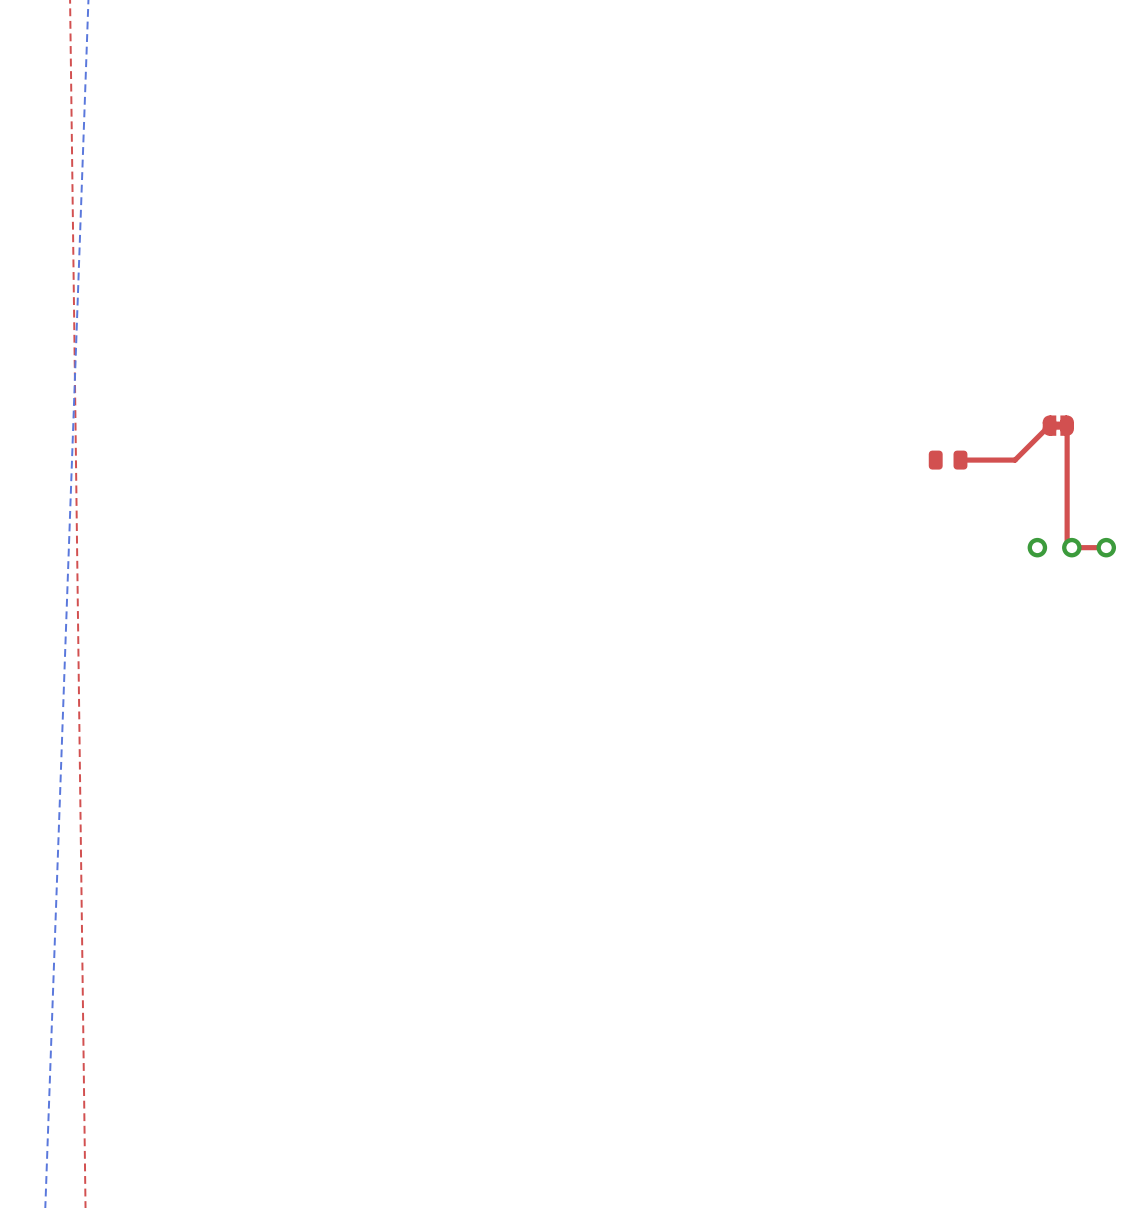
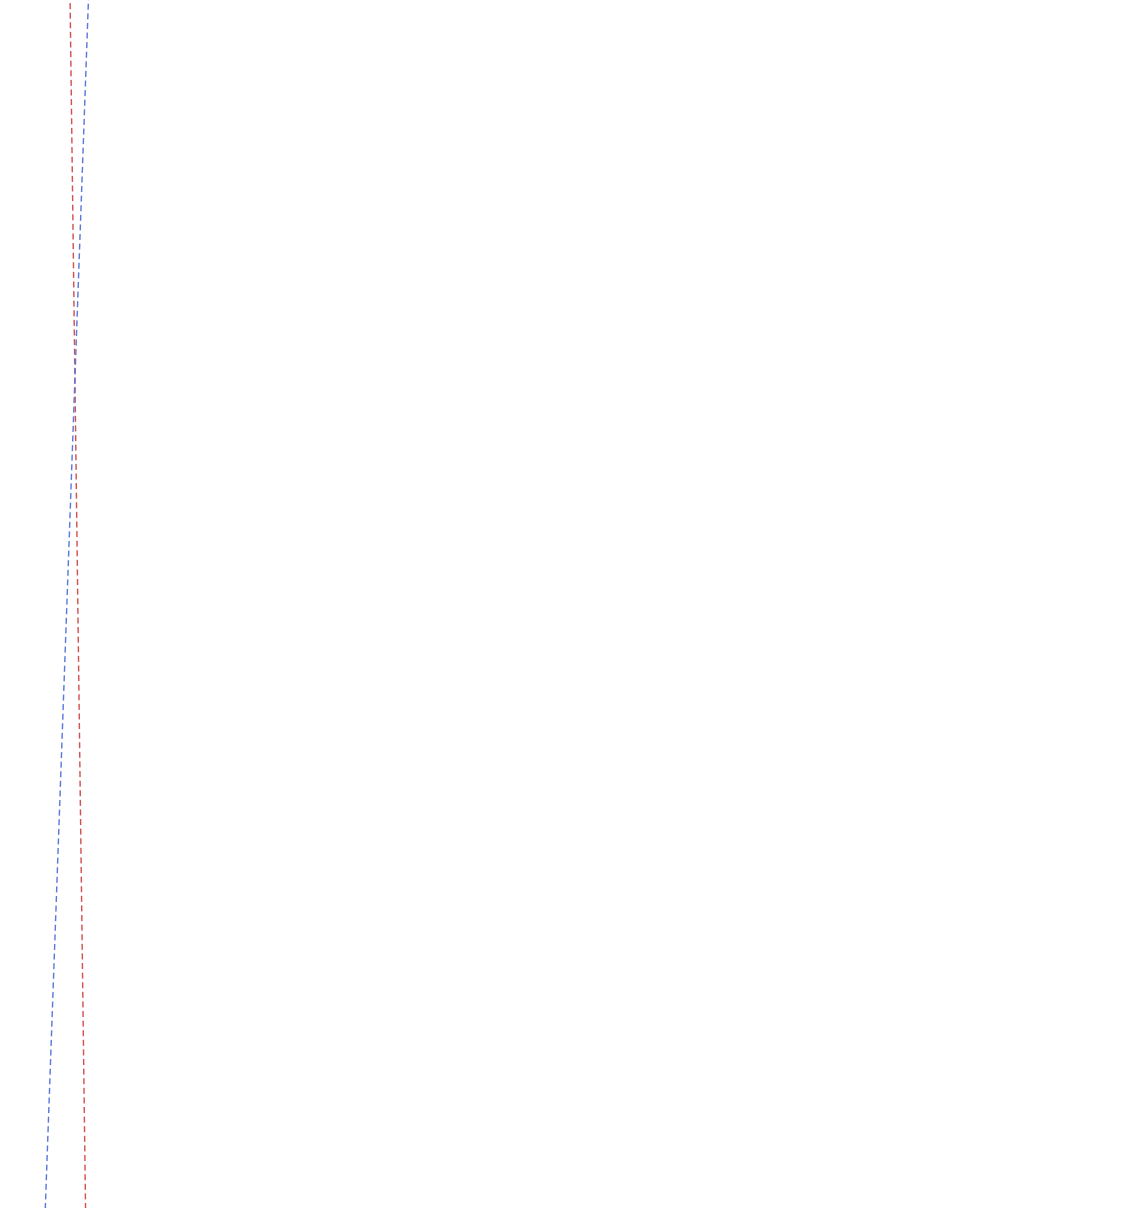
top track: (1049, 425) (1015, 460) (960, 460) -> none
part: (1058, 425) -> none
top track: (1067, 425) (1067, 542) (1071, 547) (1106, 547) -> none
part: (948, 460) -> none
part: (1071, 547) -> none

